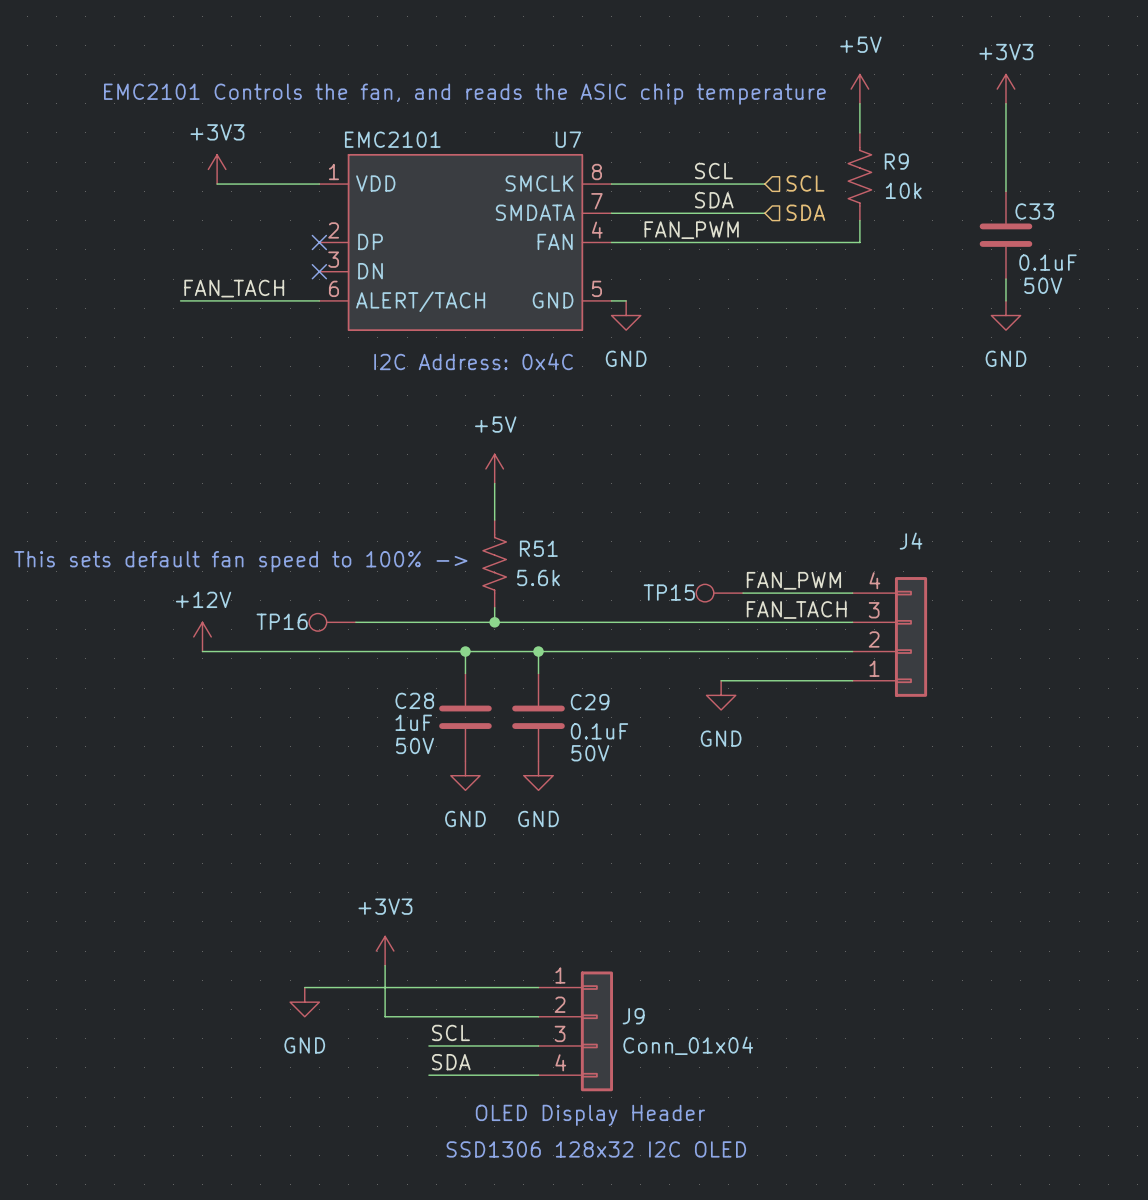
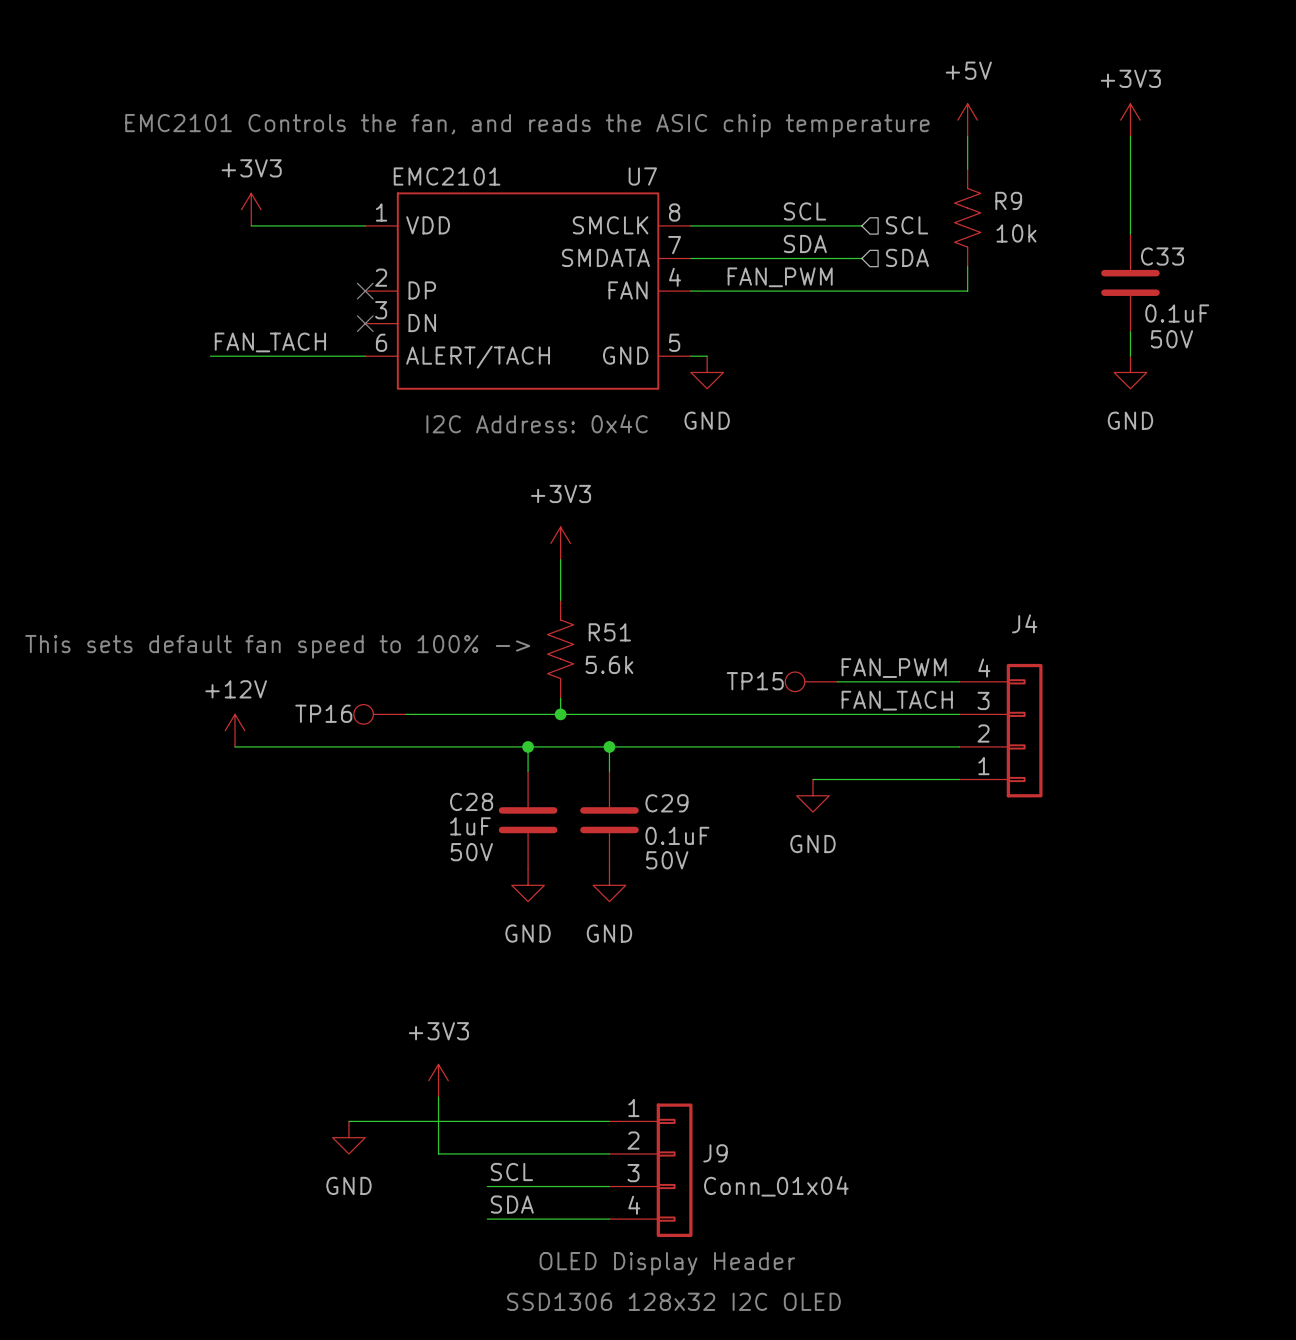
power symbol: +5V (494, 468) -> +3V3 (560, 543)

